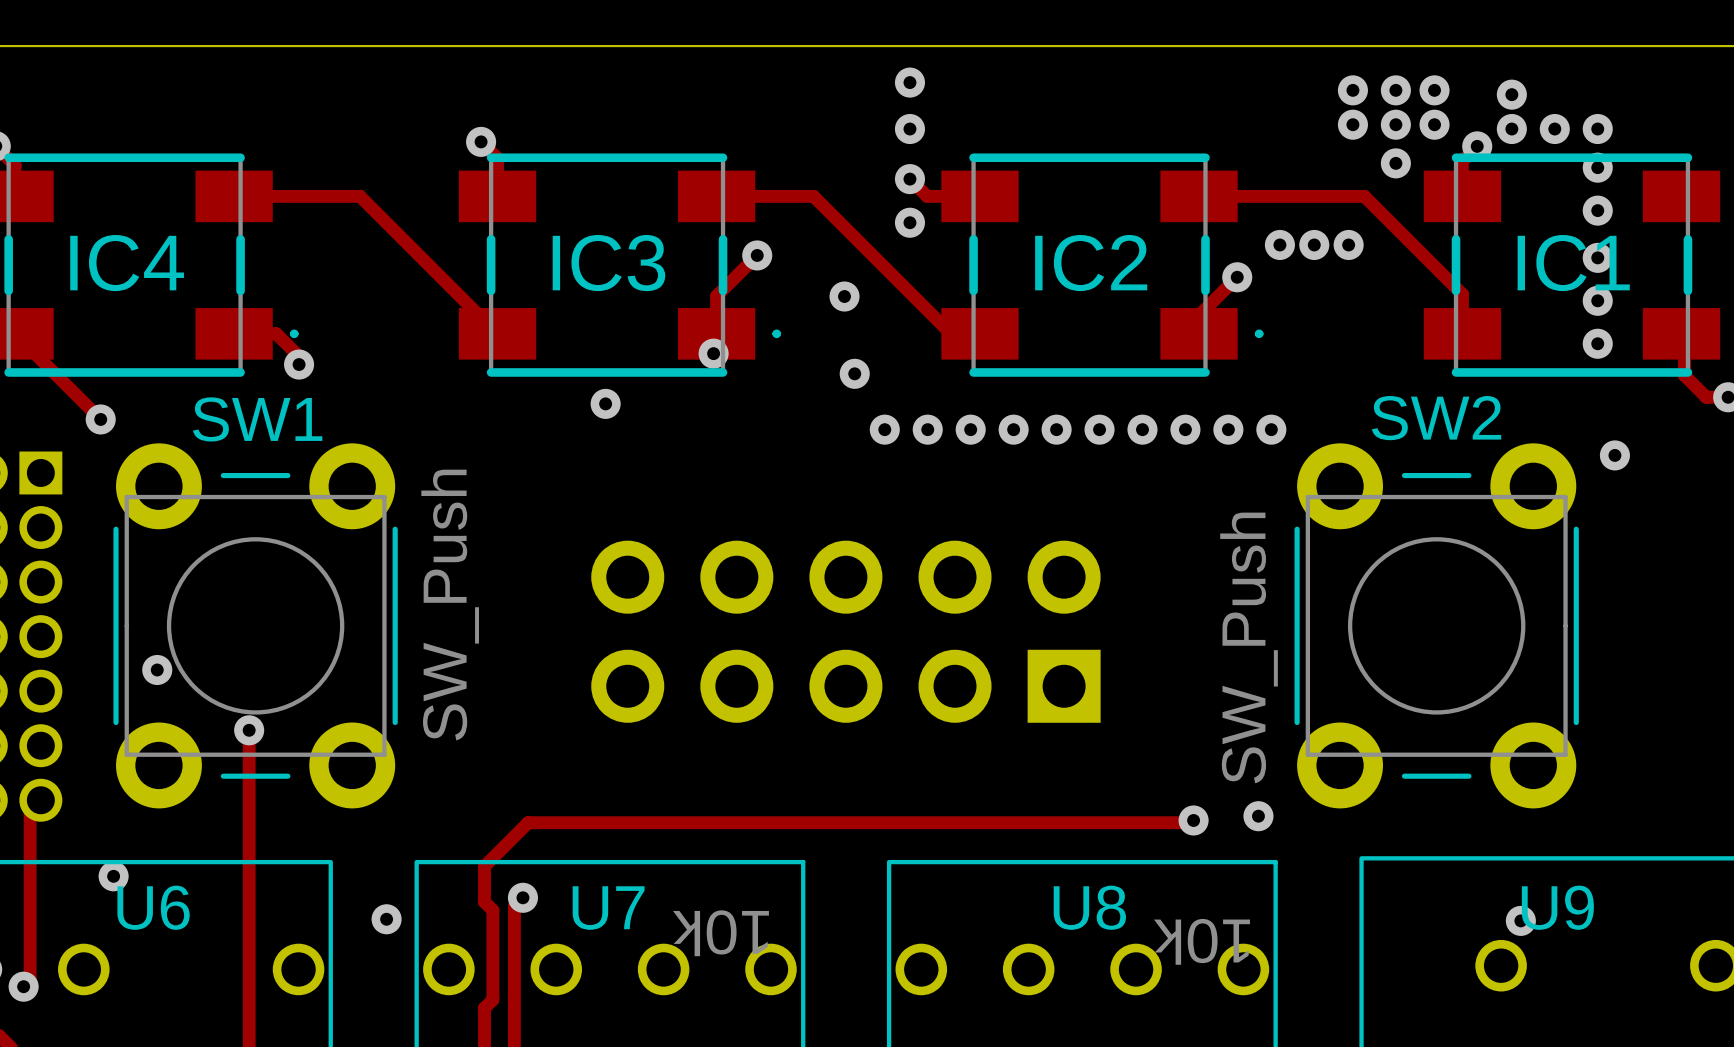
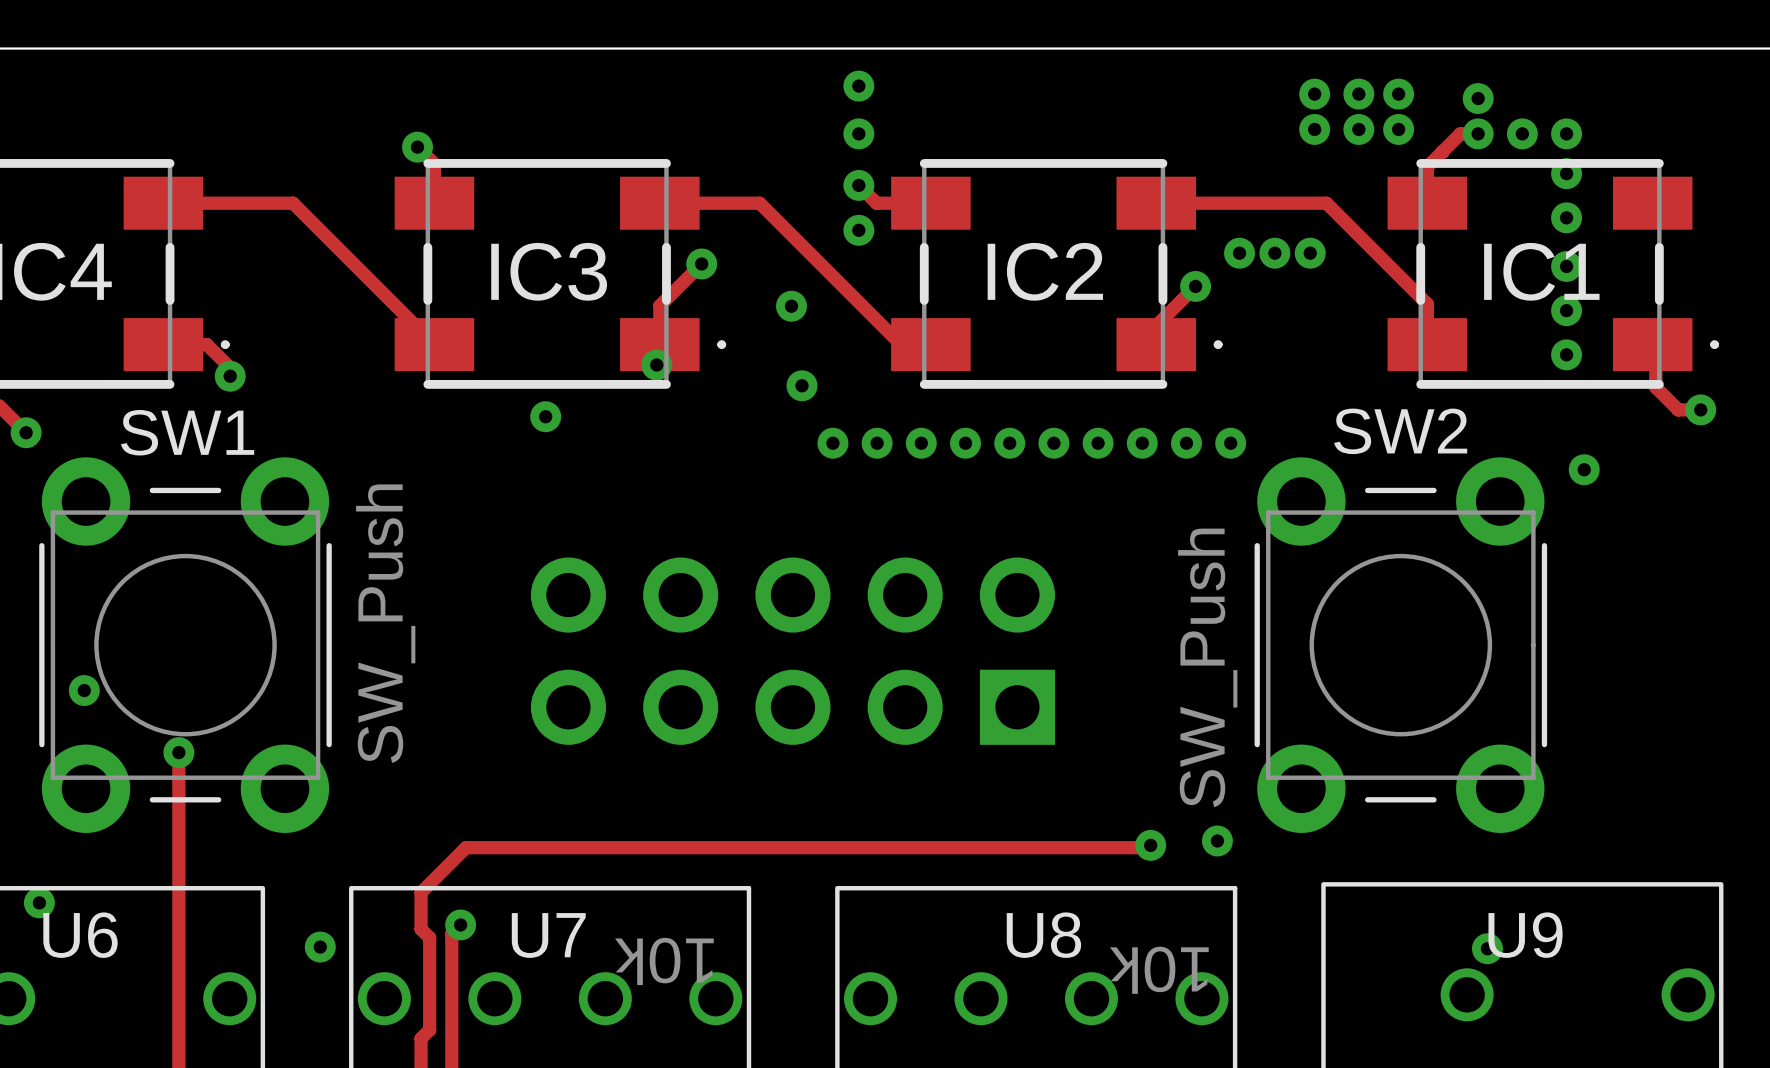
track: none -> (1476, 133) (1460, 133) (1442, 152)
via: (1477, 146) -> none
via: (1395, 163) -> none

